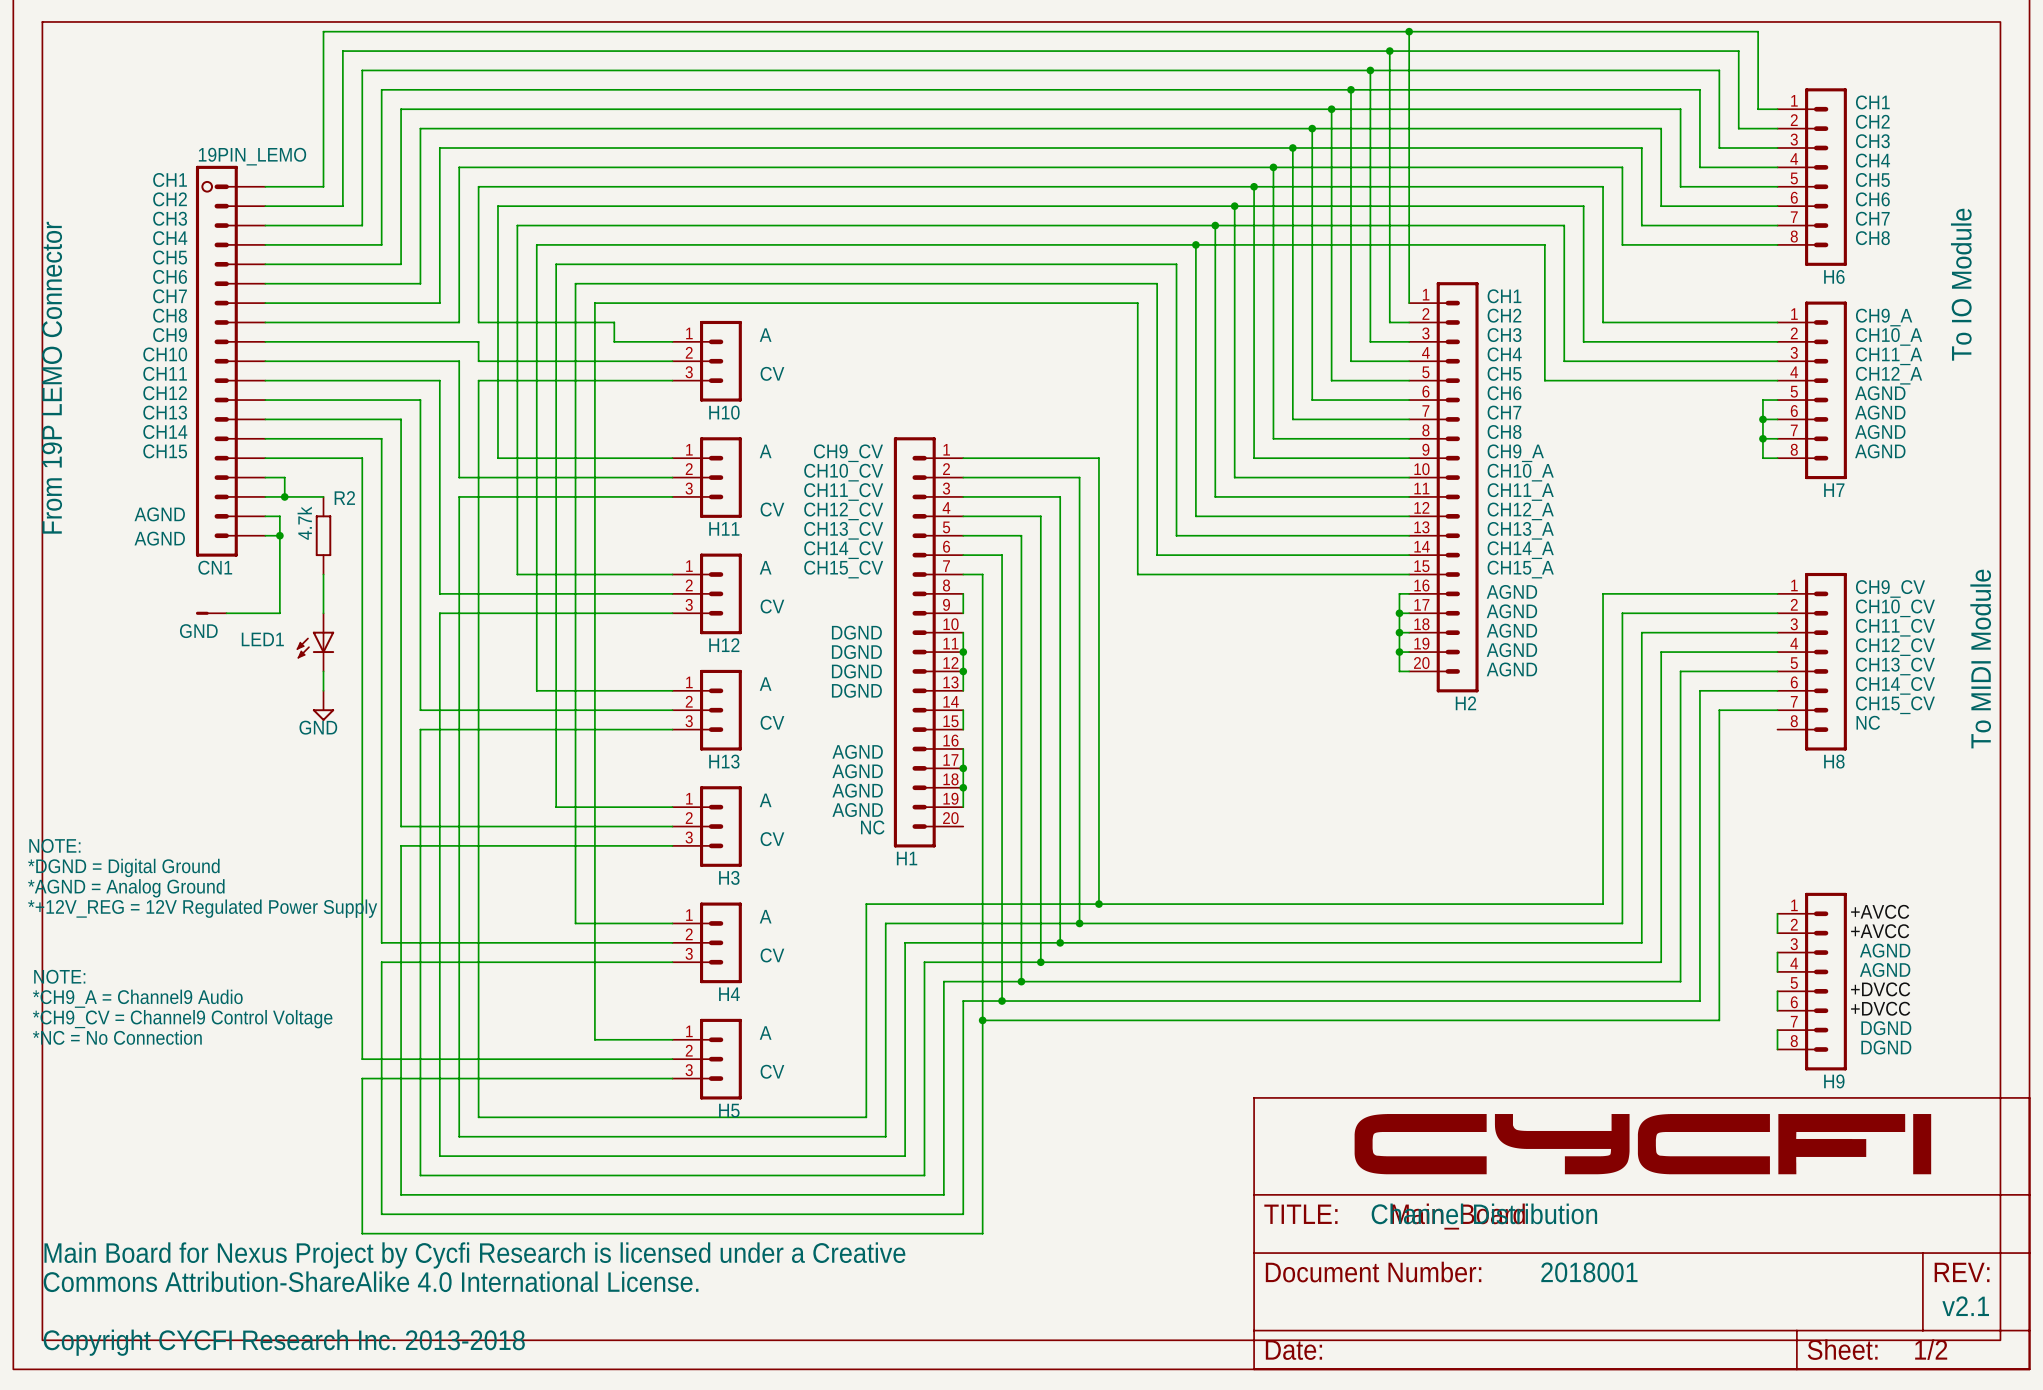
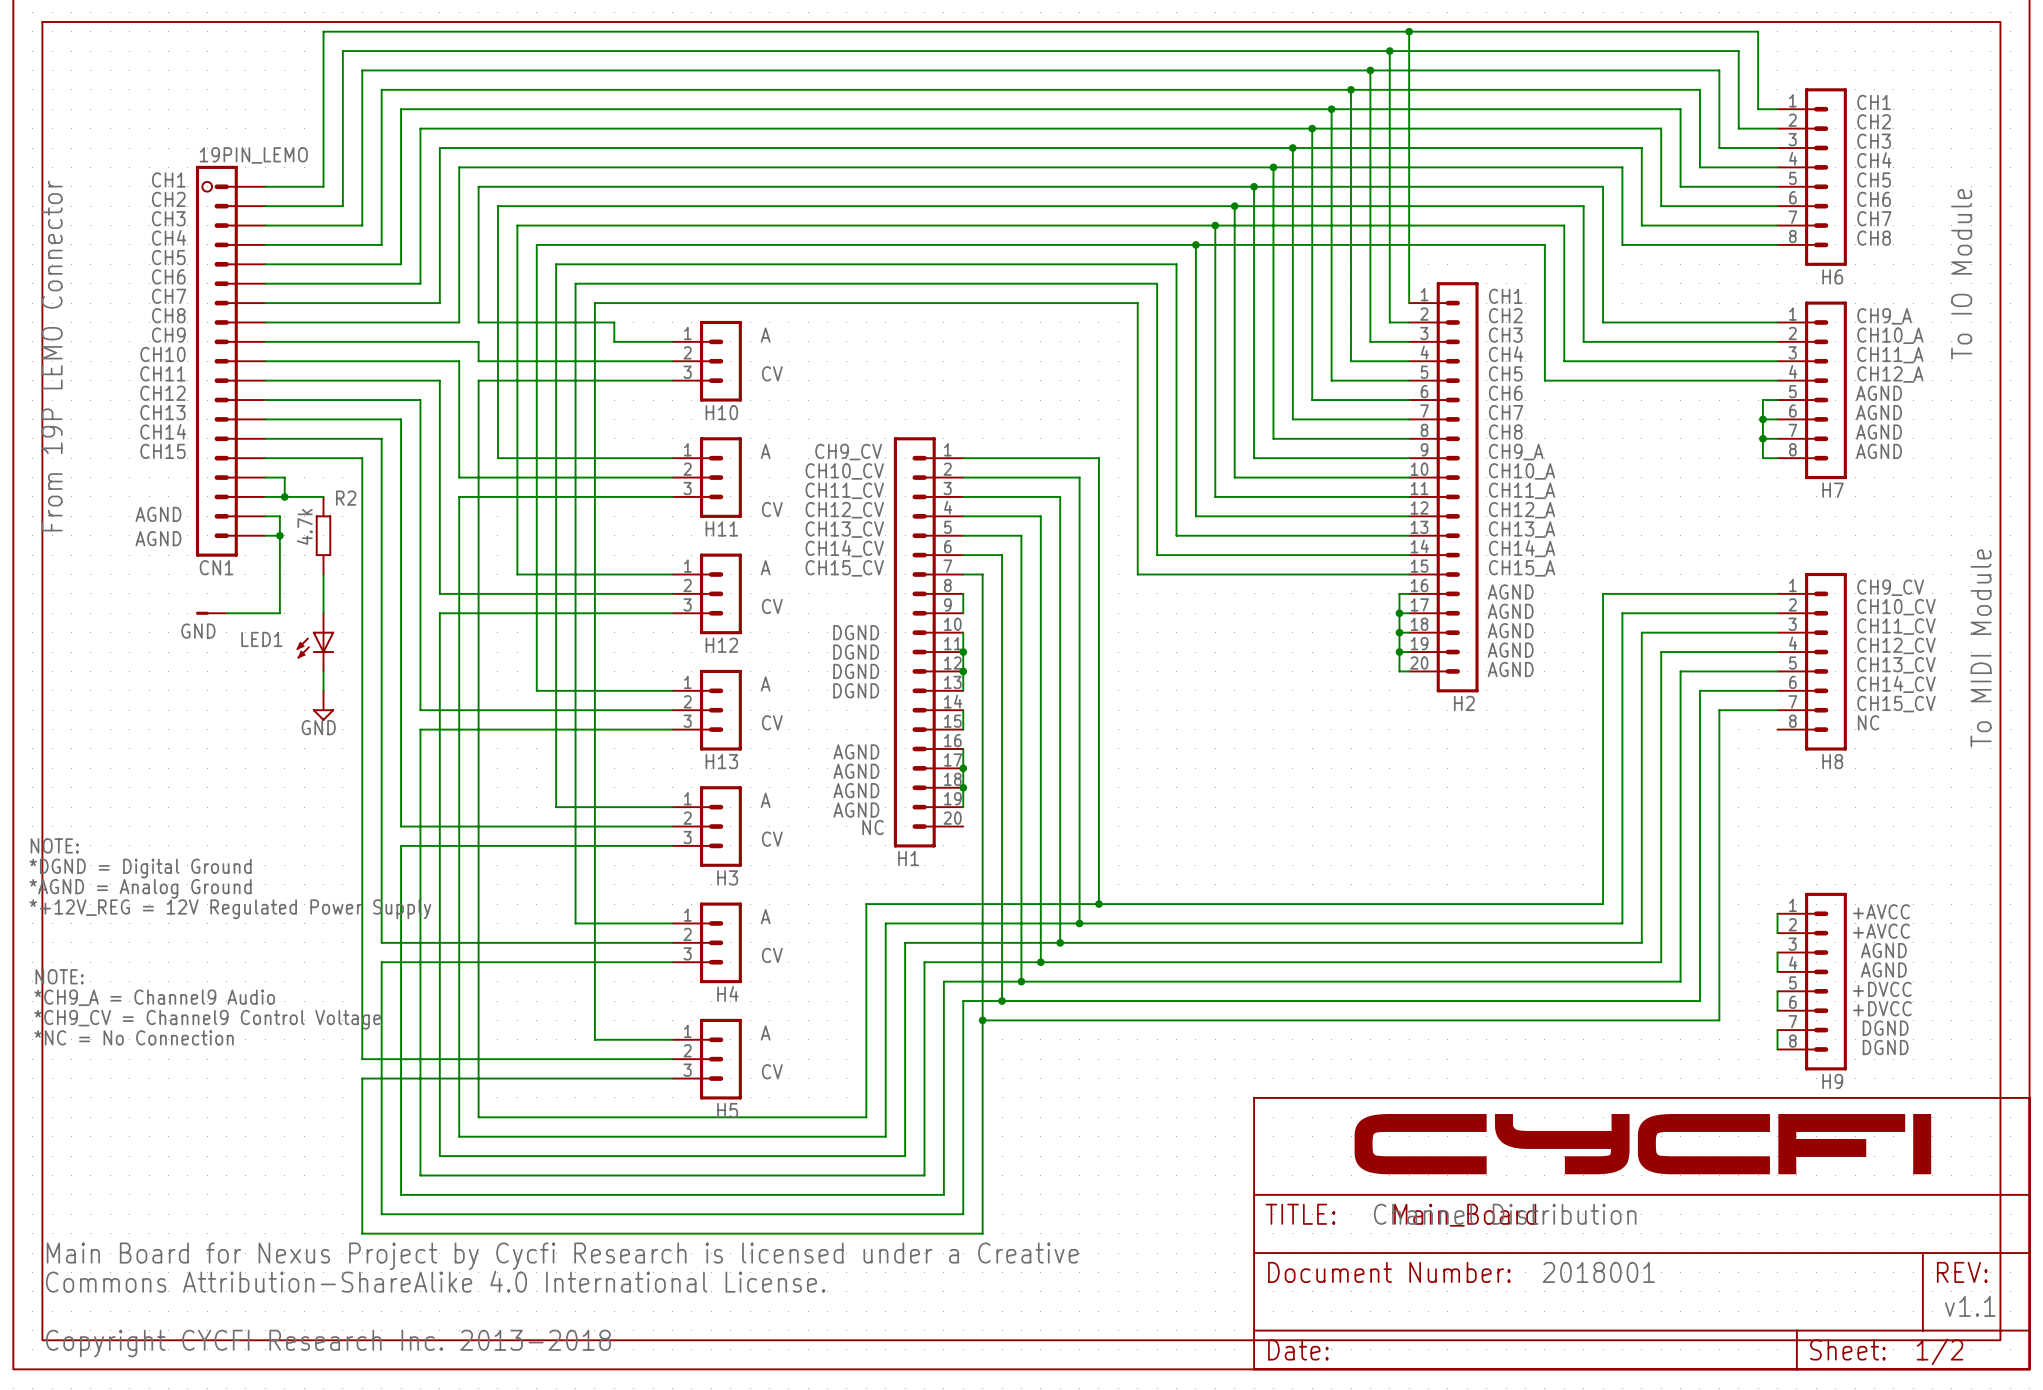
text: v2.1 (1965, 1306) -> v1.1 (1970, 1306)

